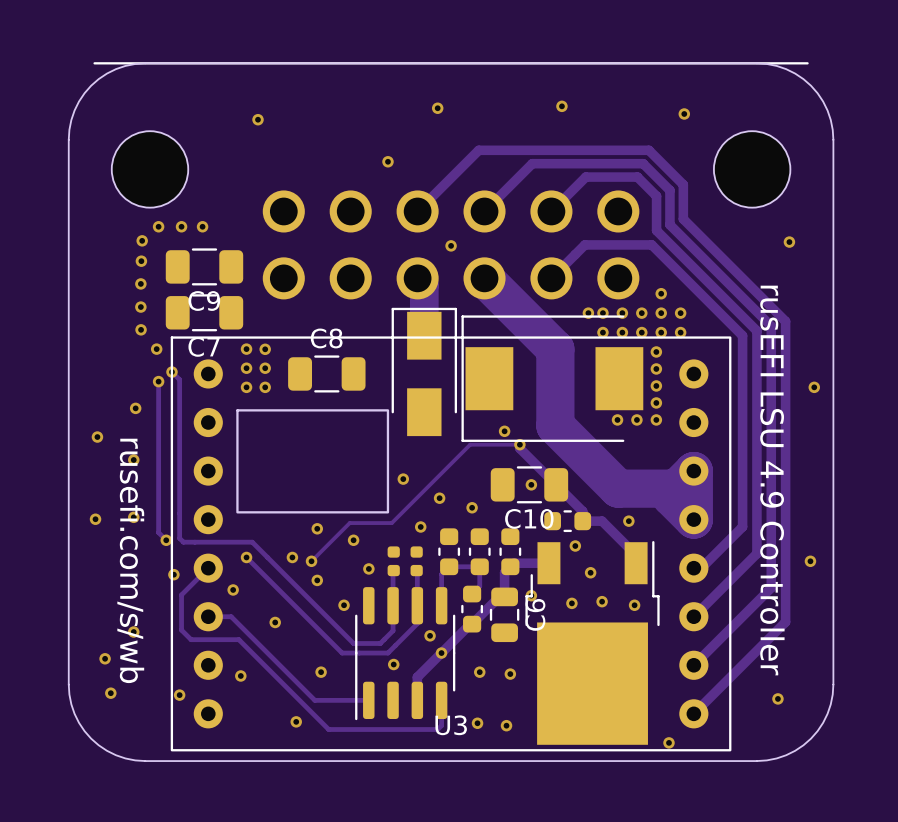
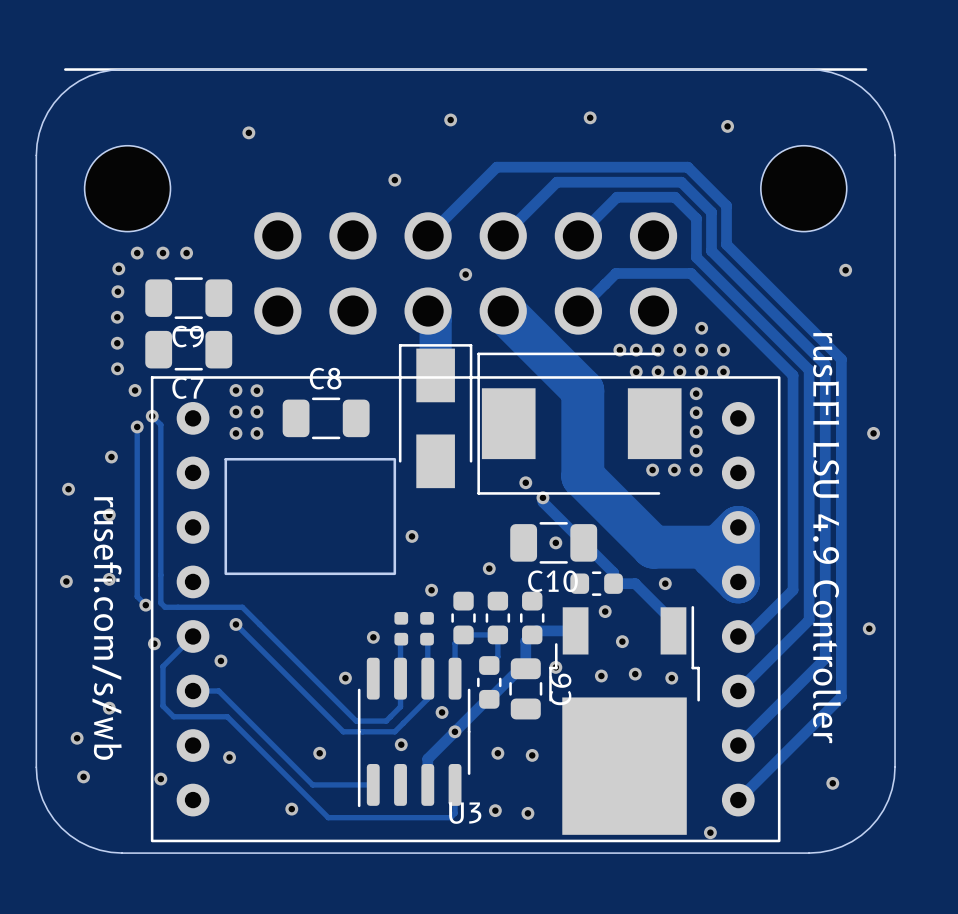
track: (519, 444) (470, 444) (391, 523) (349, 523) (311, 561) -> none
via: (439, 498) -> none
via: (317, 528) -> none
via: (353, 540) -> none
via: (292, 557) -> none
via: (311, 561) -> none
via: (317, 580) -> none
via: (275, 622) -> none

